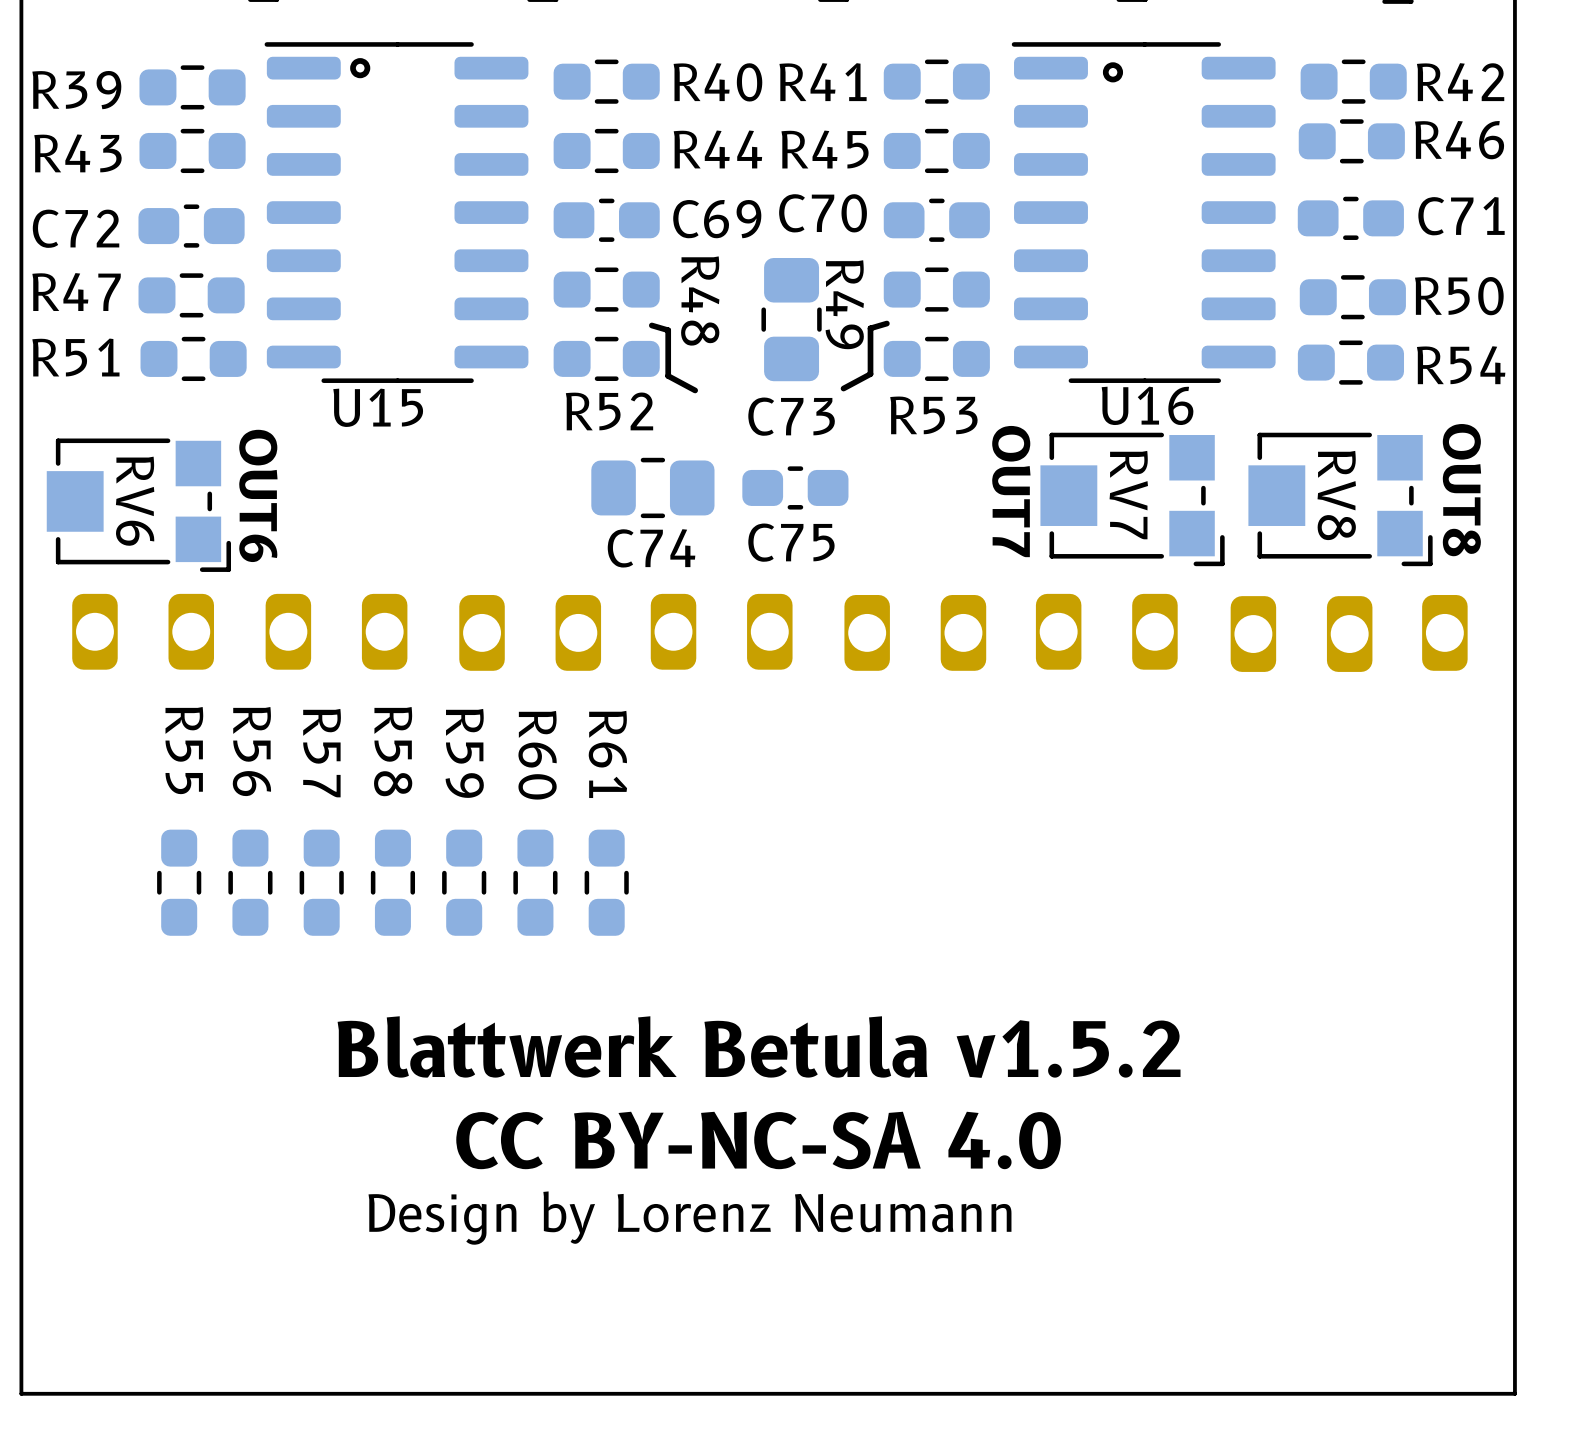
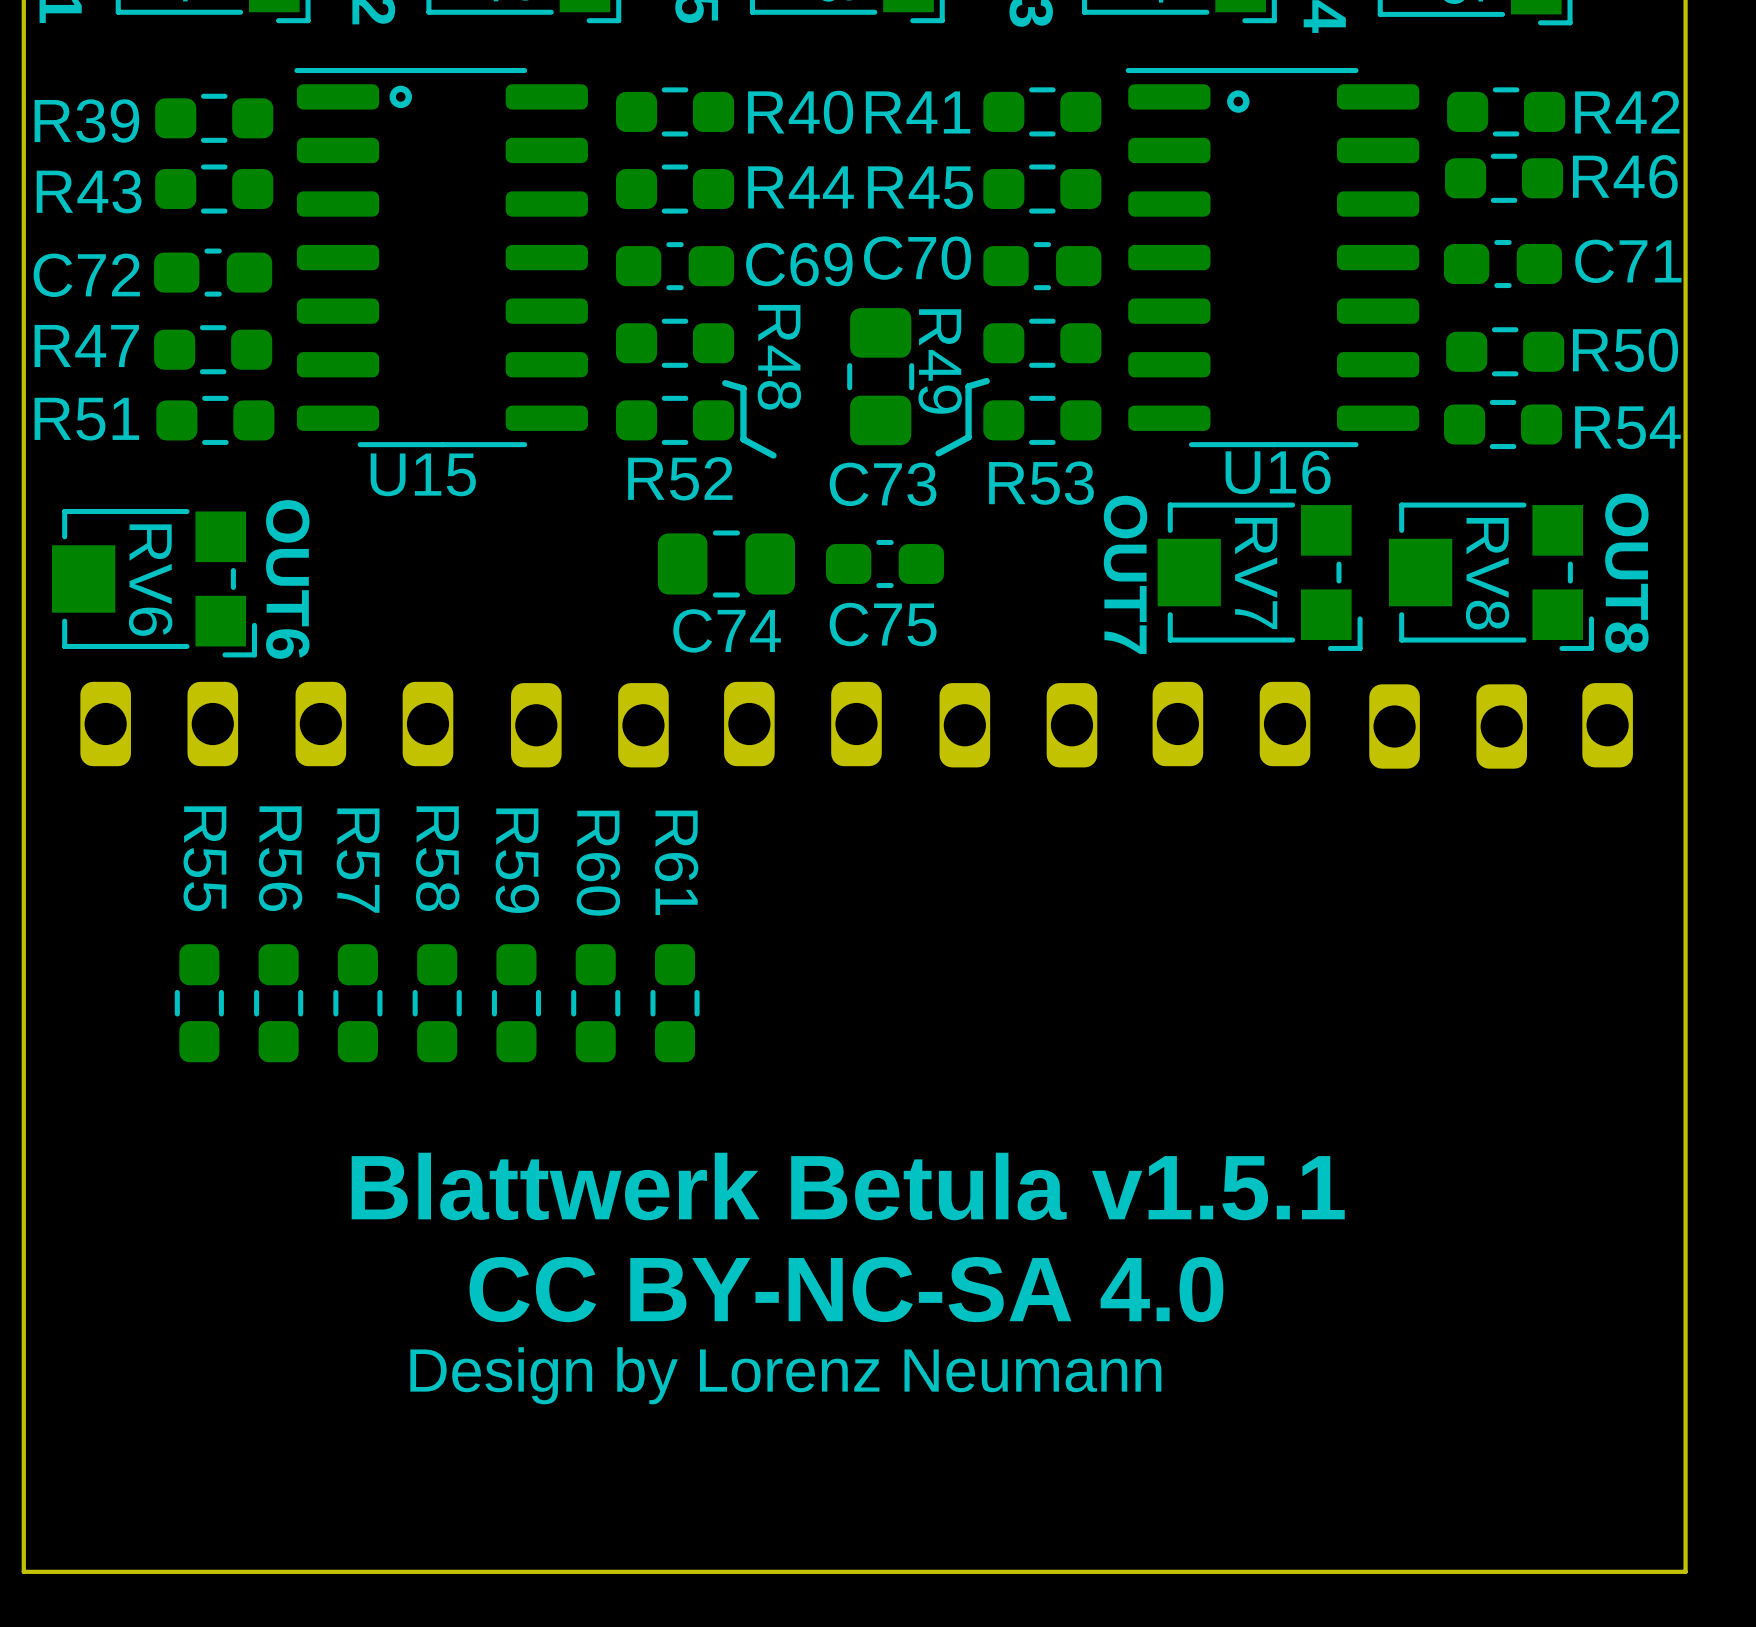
text: Blattwerk Betula v1.5.2 (759, 1047) -> Blattwerk Betula v1.5.1 (848, 1186)

